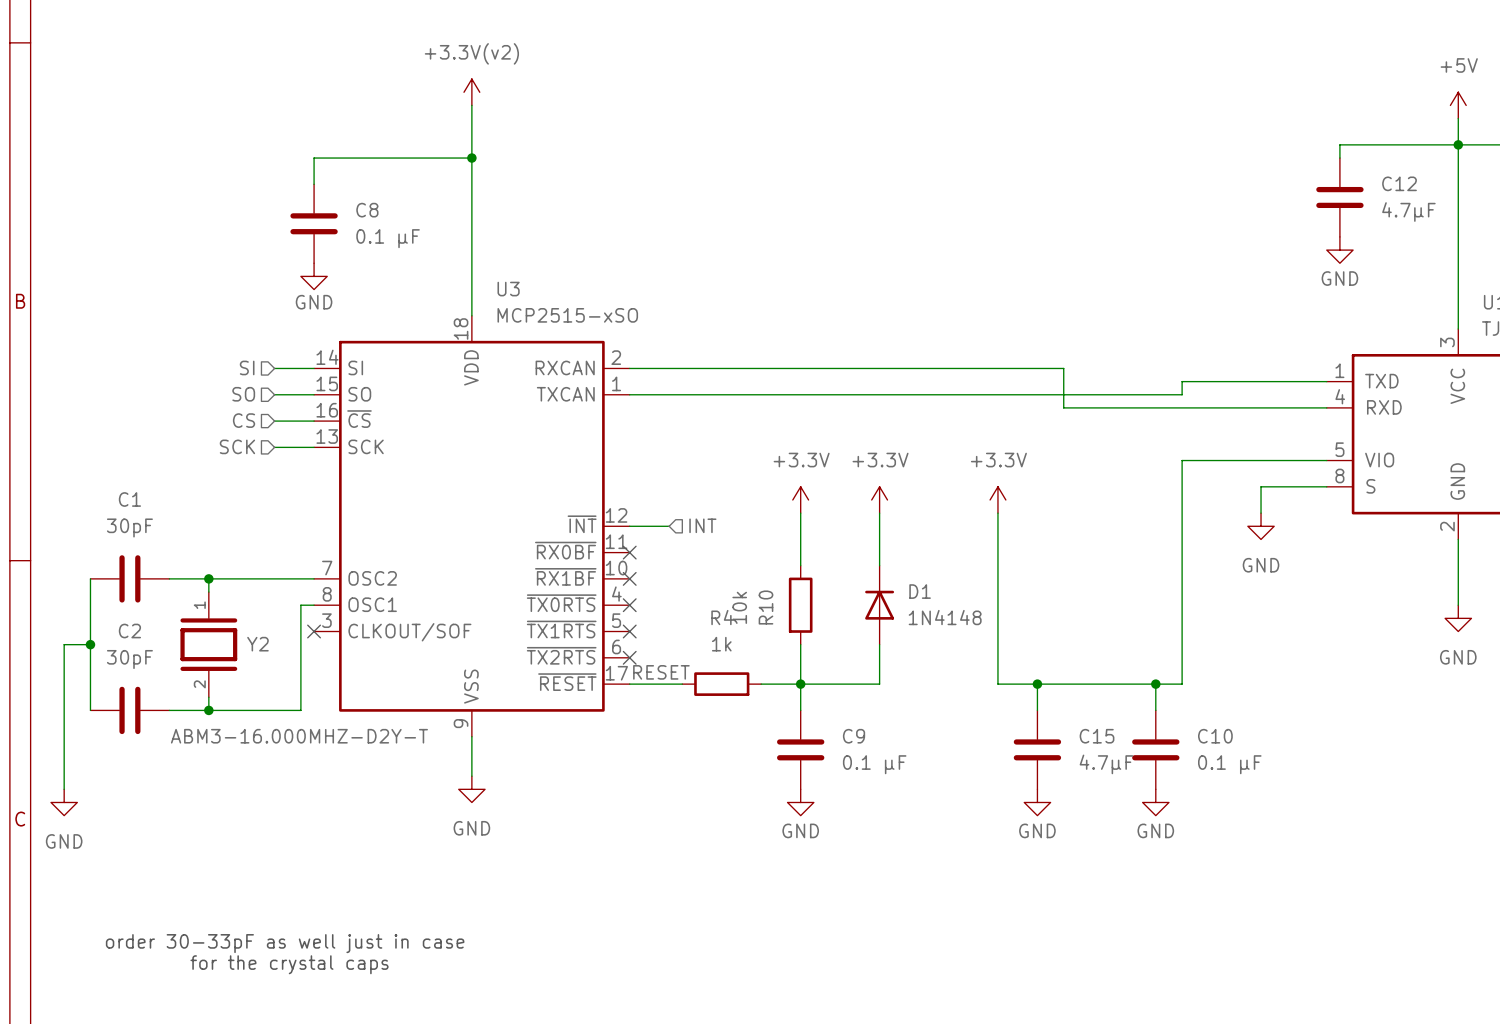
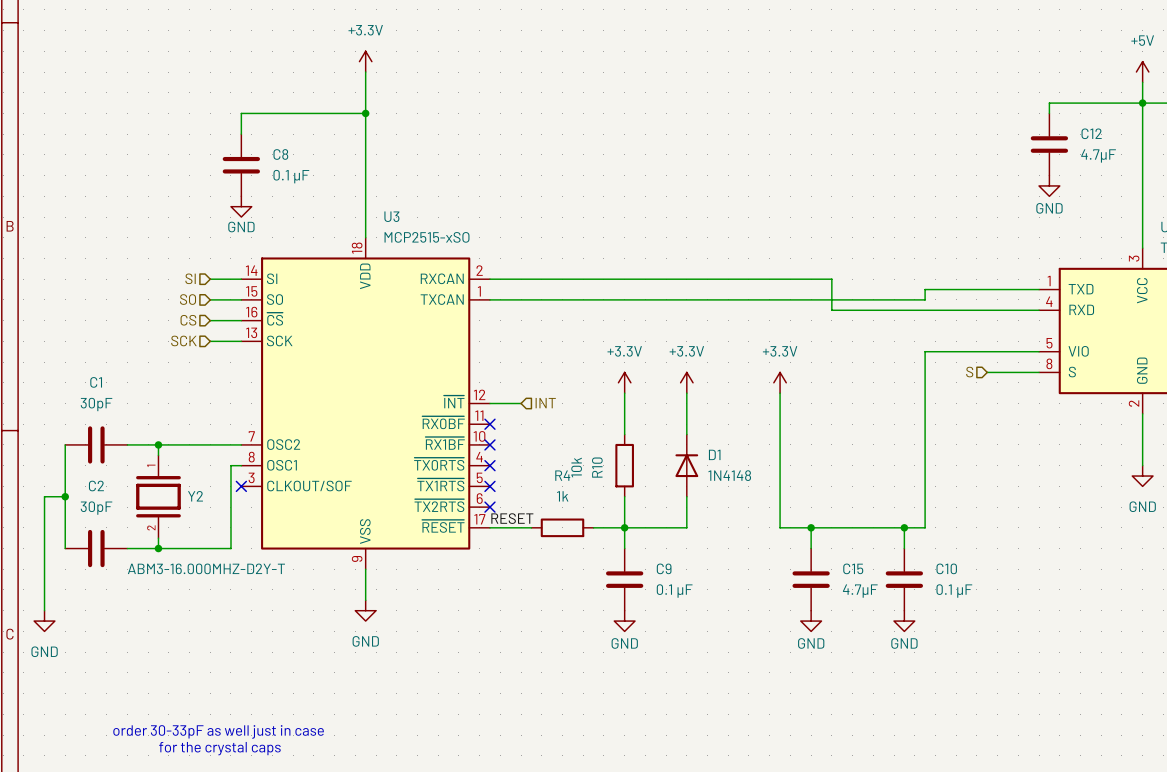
power symbol: +3.3V(v2) (471, 92) -> +3.3V (365, 61)
hierarchical label: none -> S (969, 372)
wire: (1261, 486) (1261, 513) -> none
power symbol: GND (1261, 526) -> none

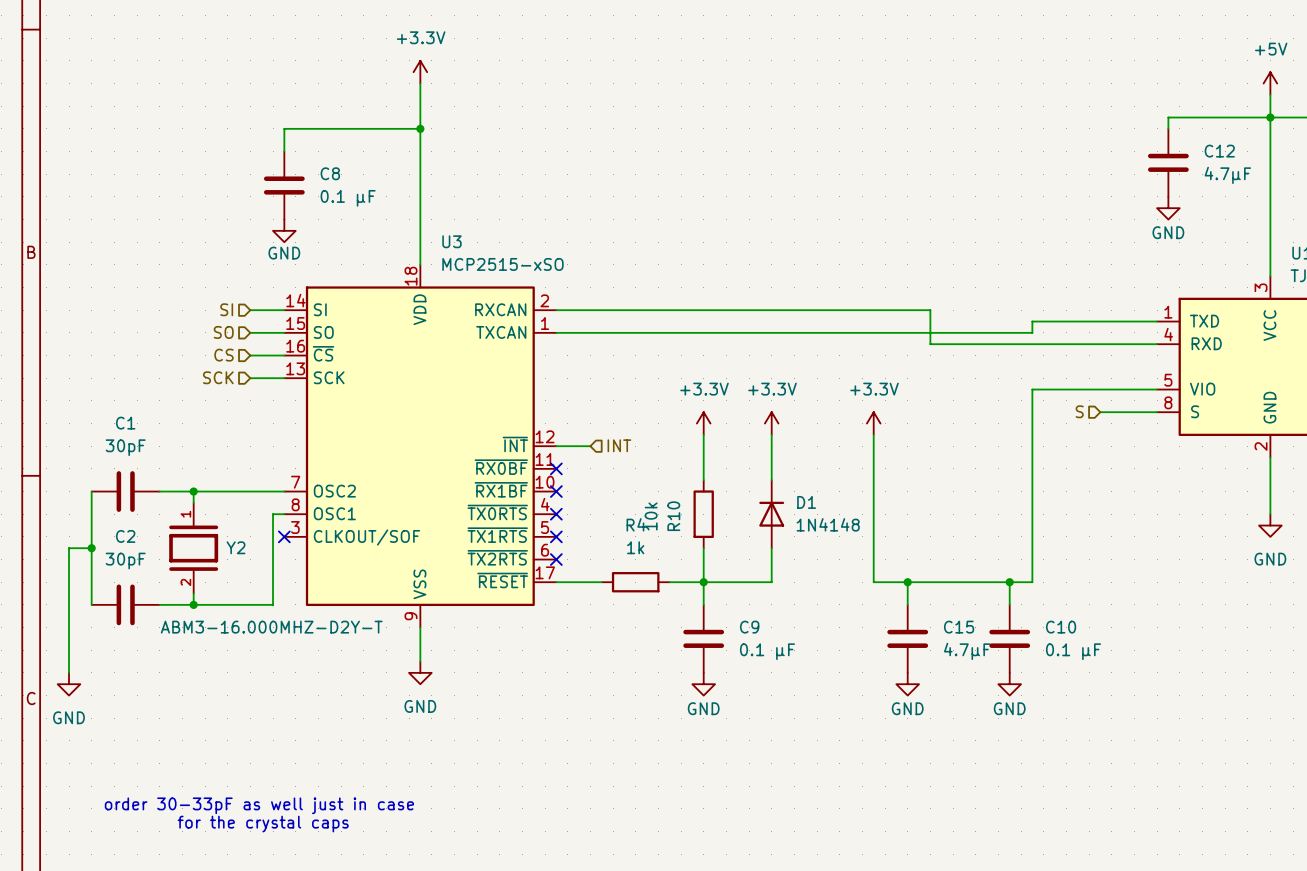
label: RESET (512, 518) -> none

